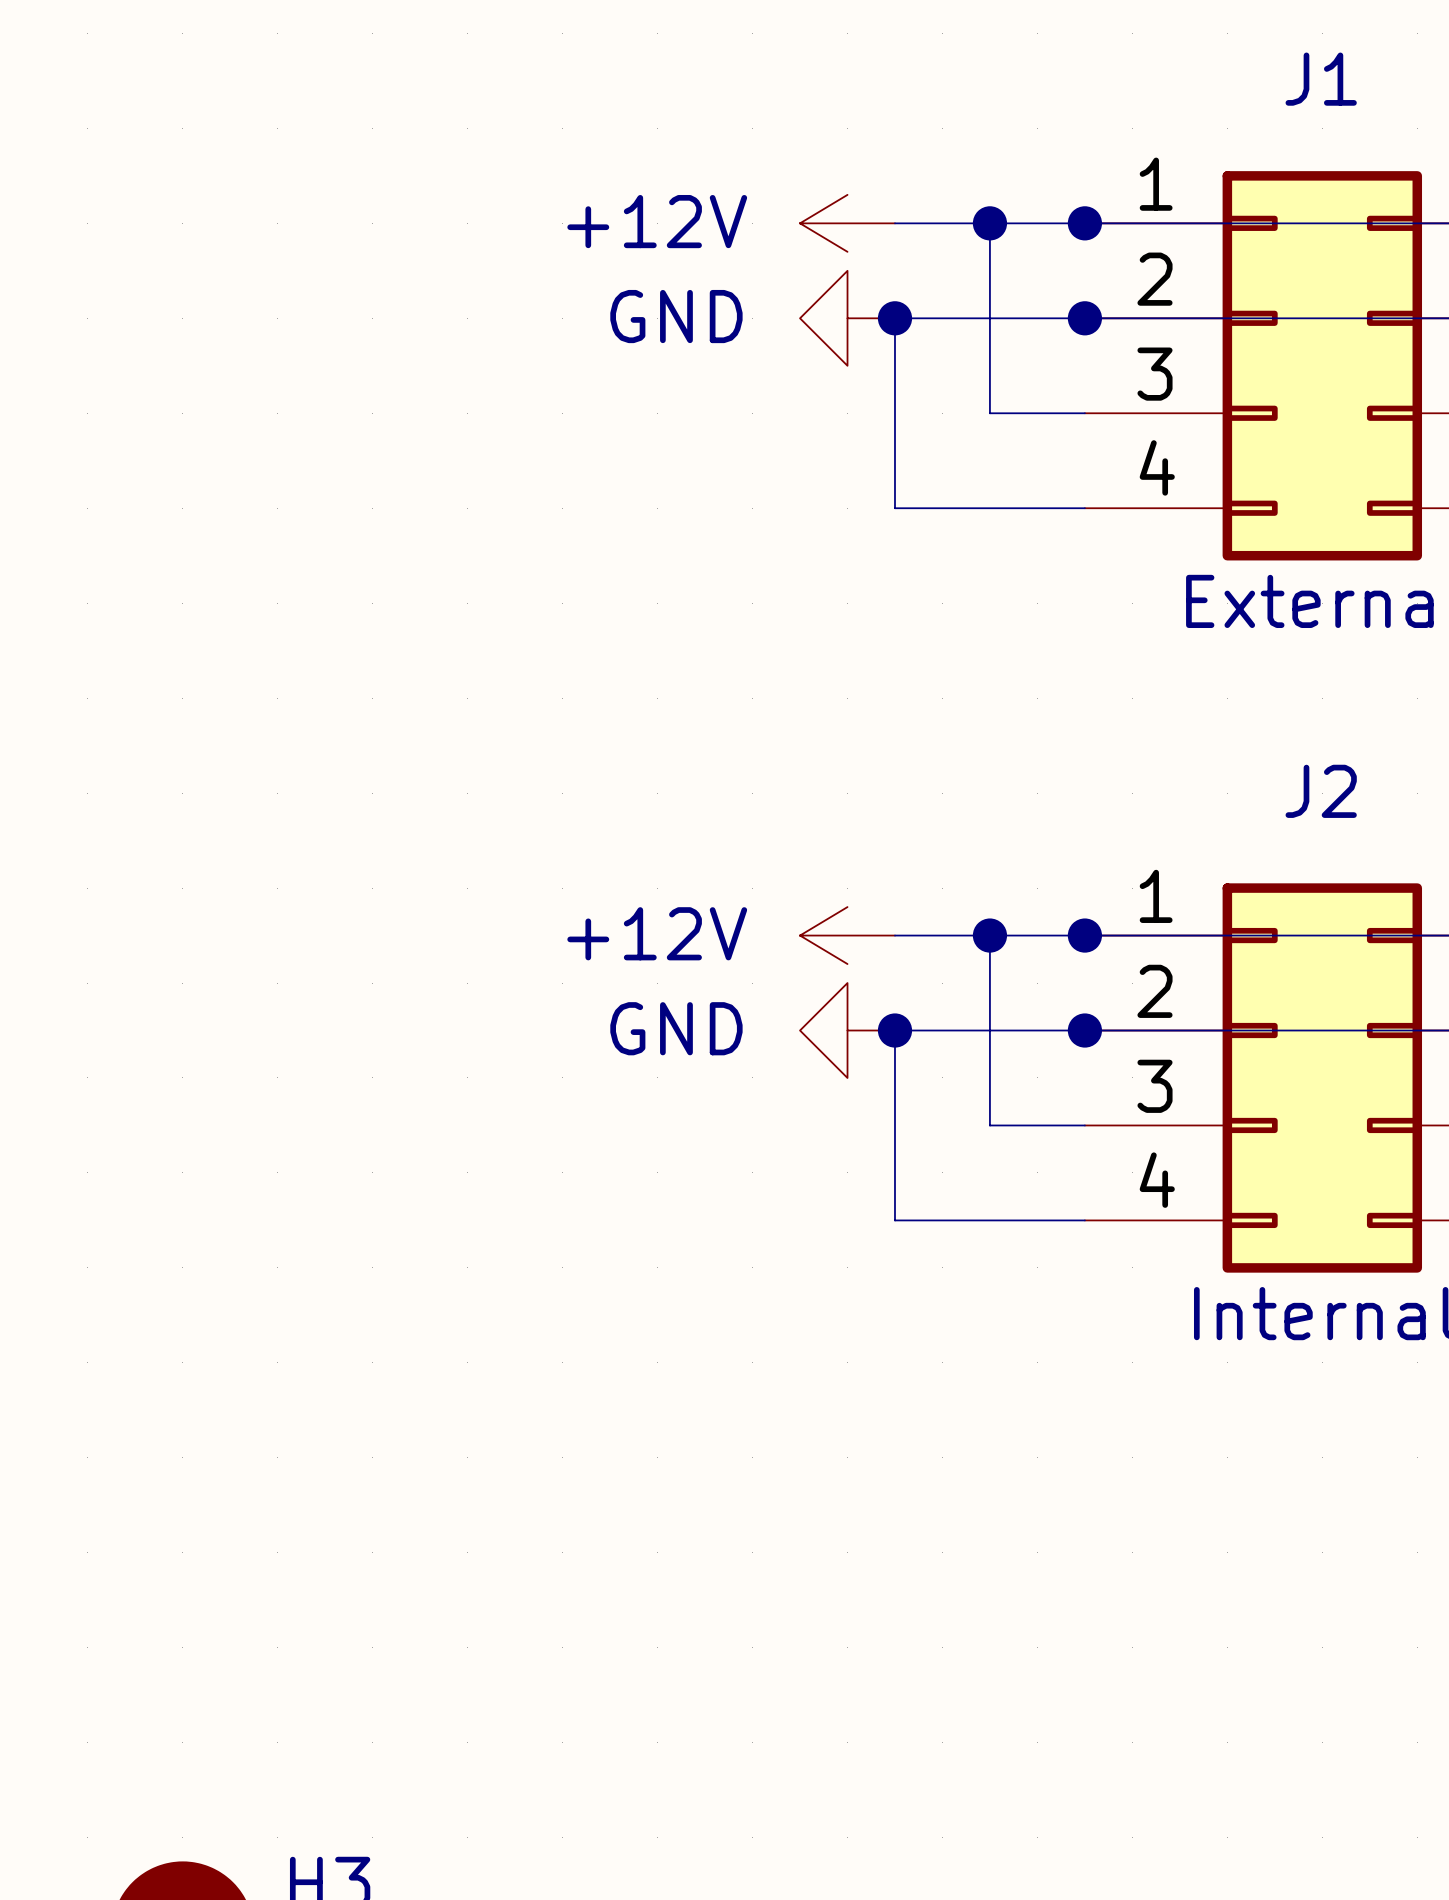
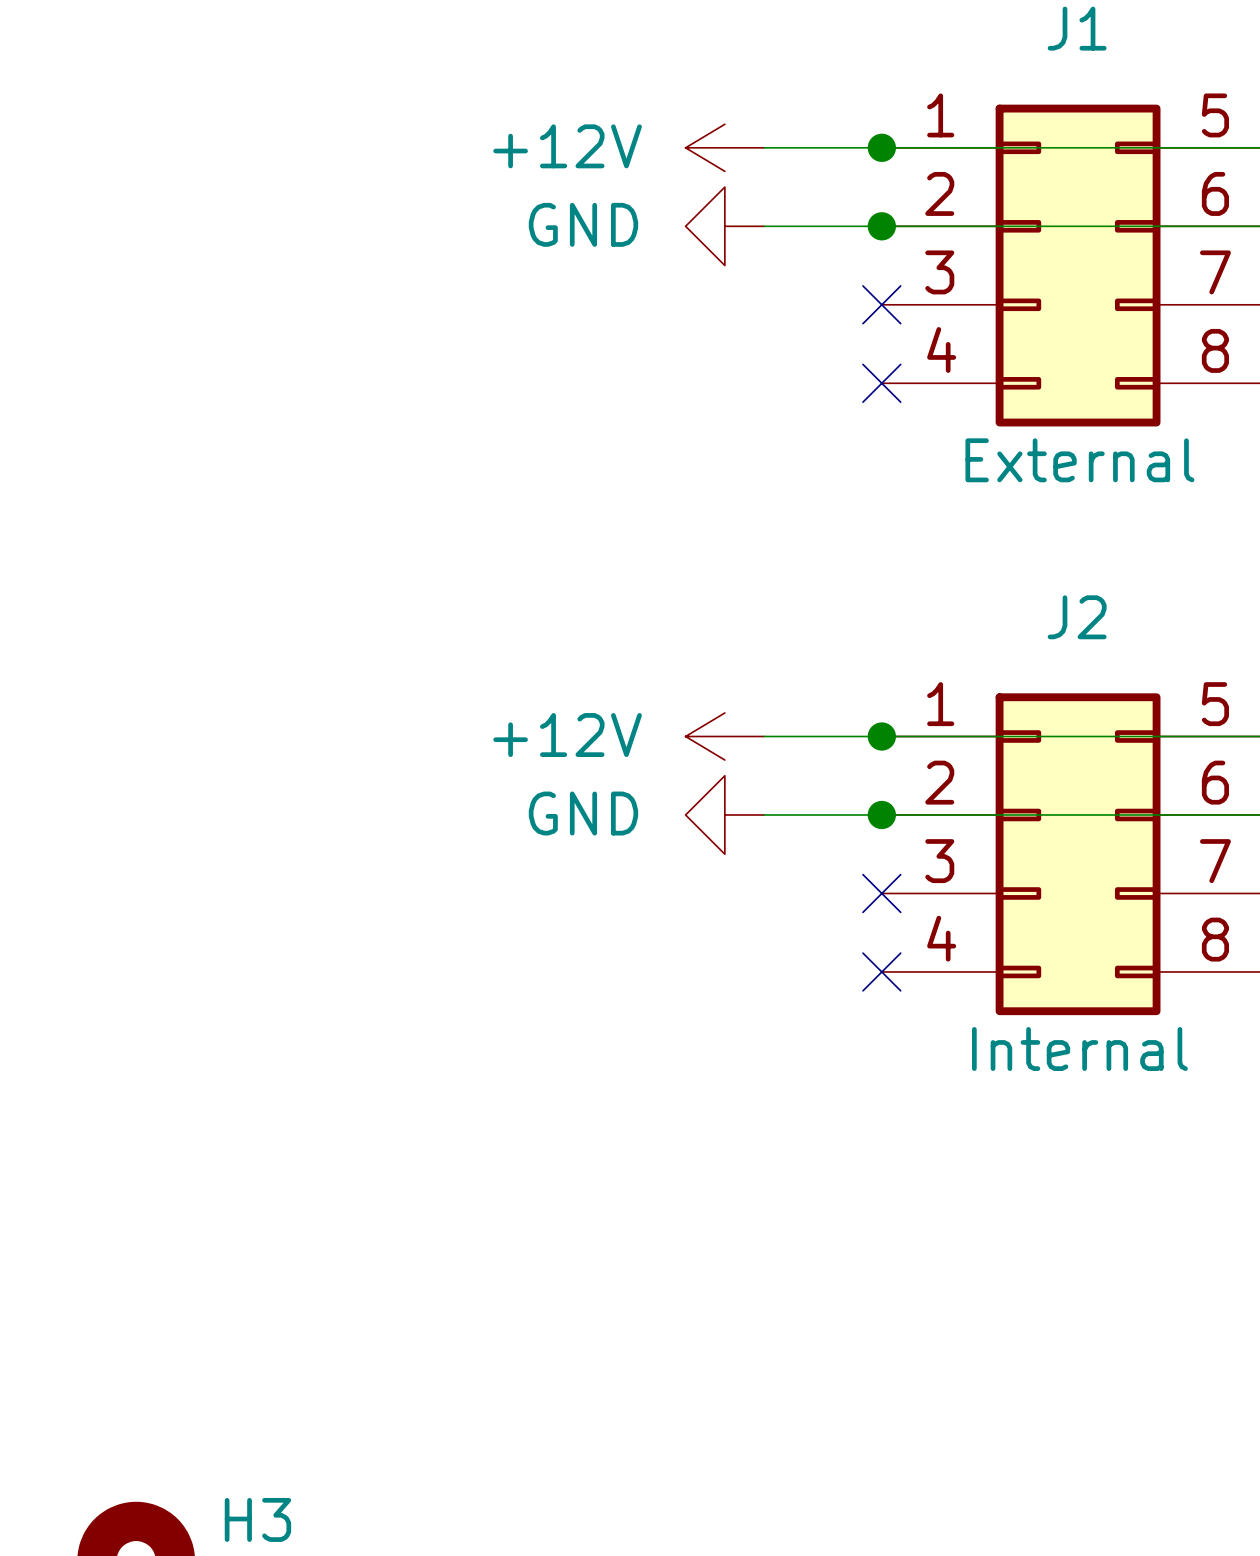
power symbol position: +12V (847, 223) -> +12V (724, 147)
wire: (989, 223) (989, 413) (1084, 413) -> none
junction: (989, 223) -> none
power symbol position: GND (847, 318) -> GND (724, 226)
junction: (894, 318) -> none
wire: (942, 318) (894, 318) (894, 508) (1084, 508) -> none
no-connect mark: none -> (881, 304)
no-connect mark: none -> (881, 383)
power symbol position: +12V (847, 935) -> +12V (724, 736)
wire: (989, 935) (989, 1125) (1084, 1125) -> none
junction: (989, 935) -> none
power symbol position: GND (847, 1030) -> GND (724, 814)
junction: (894, 1030) -> none
wire: (942, 1030) (894, 1030) (894, 1220) (1084, 1220) -> none
no-connect mark: none -> (881, 893)
no-connect mark: none -> (881, 971)

